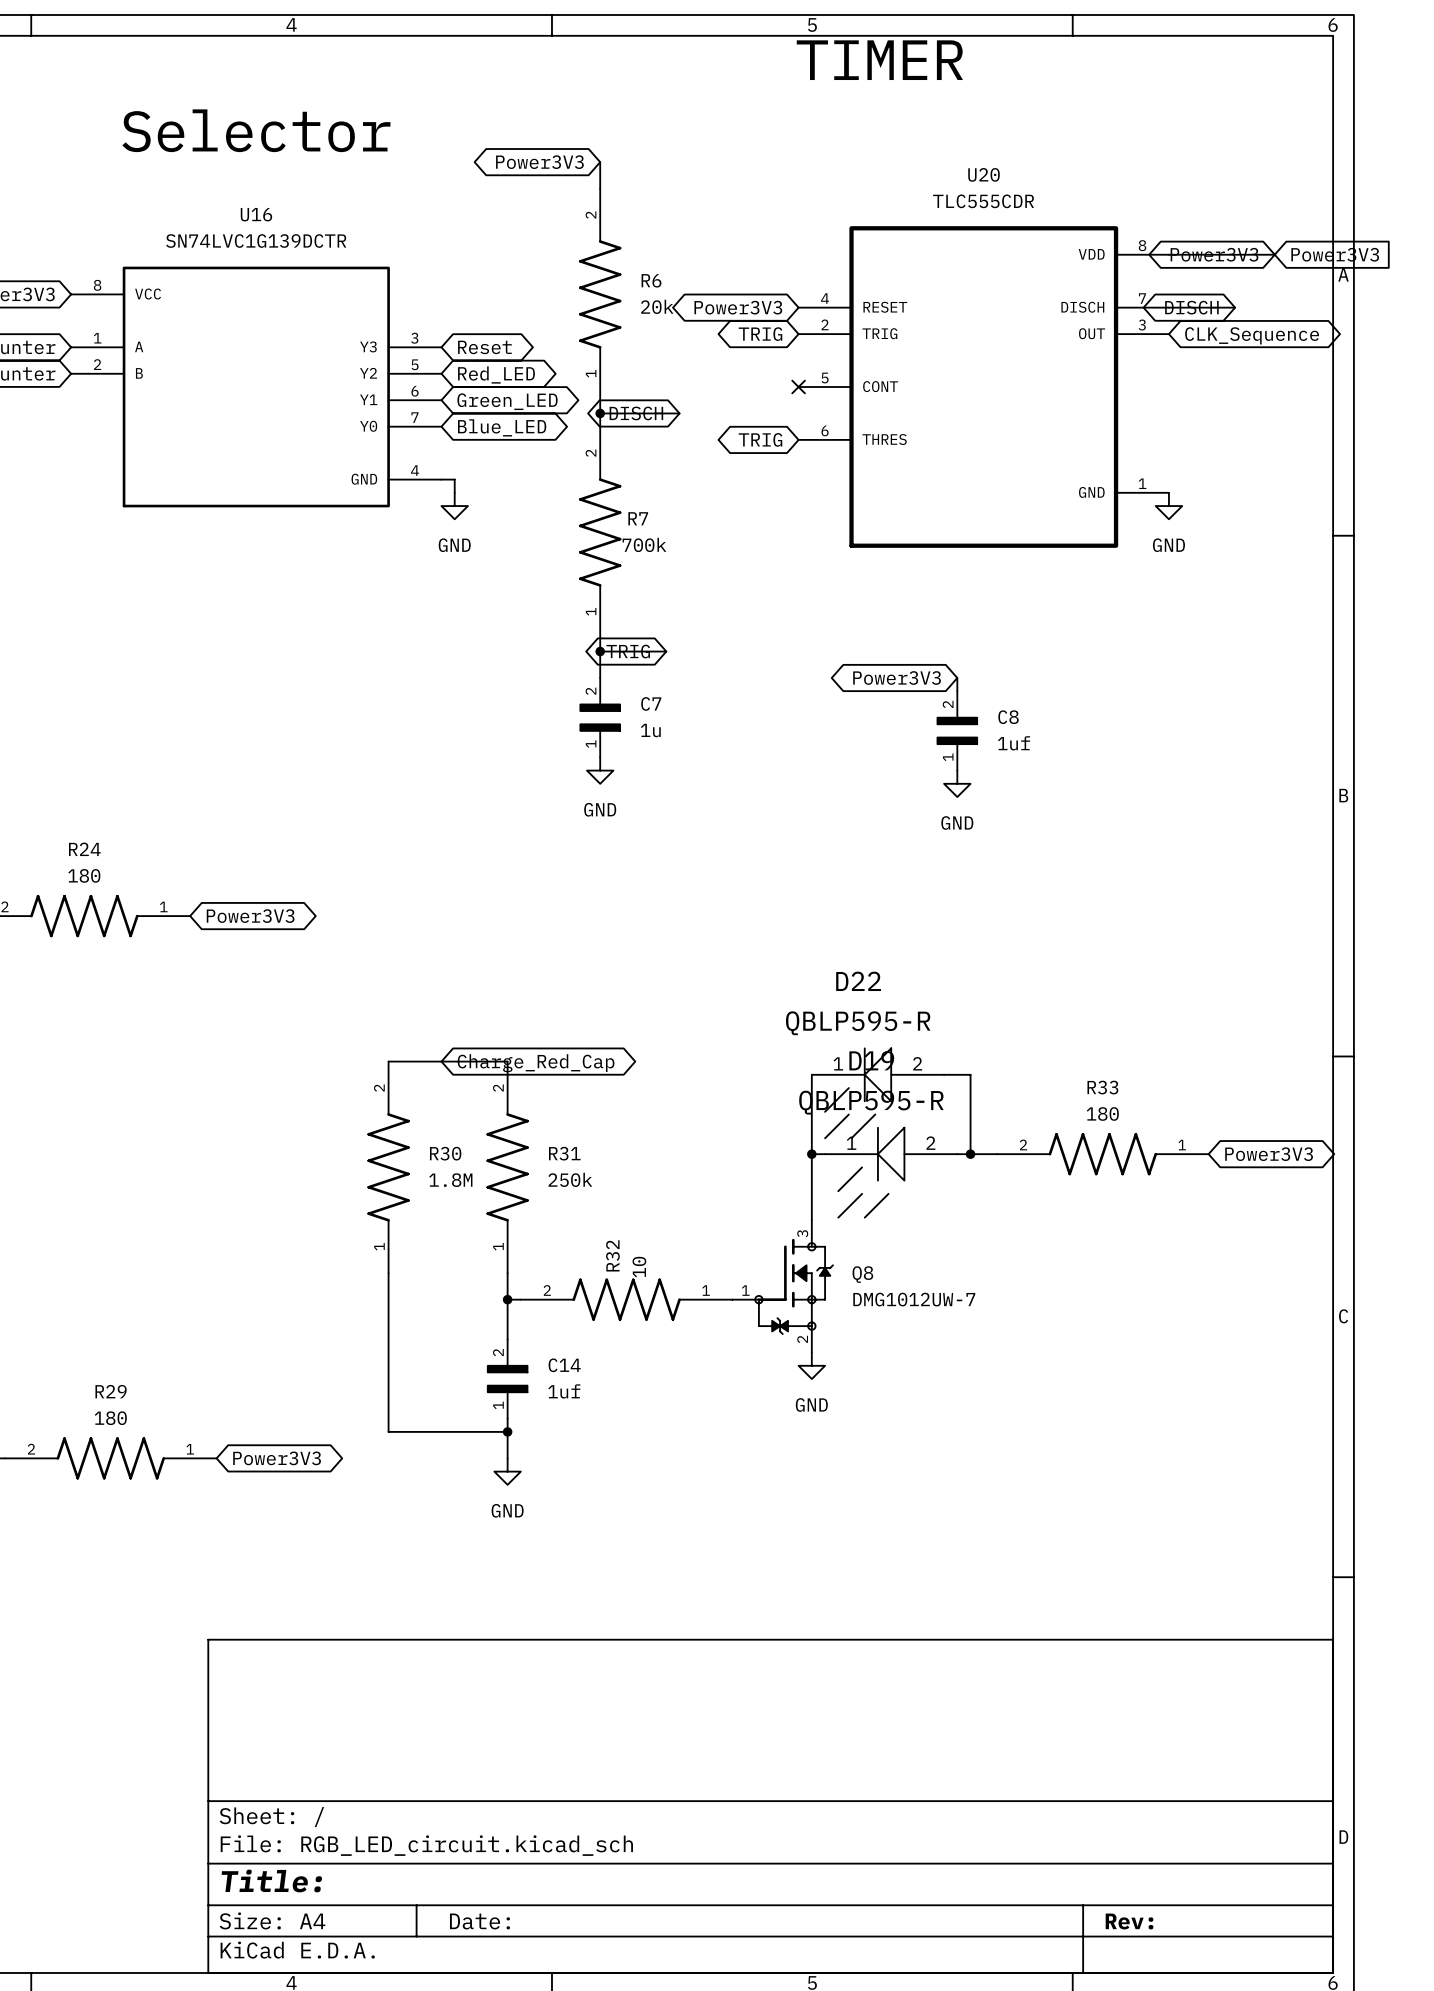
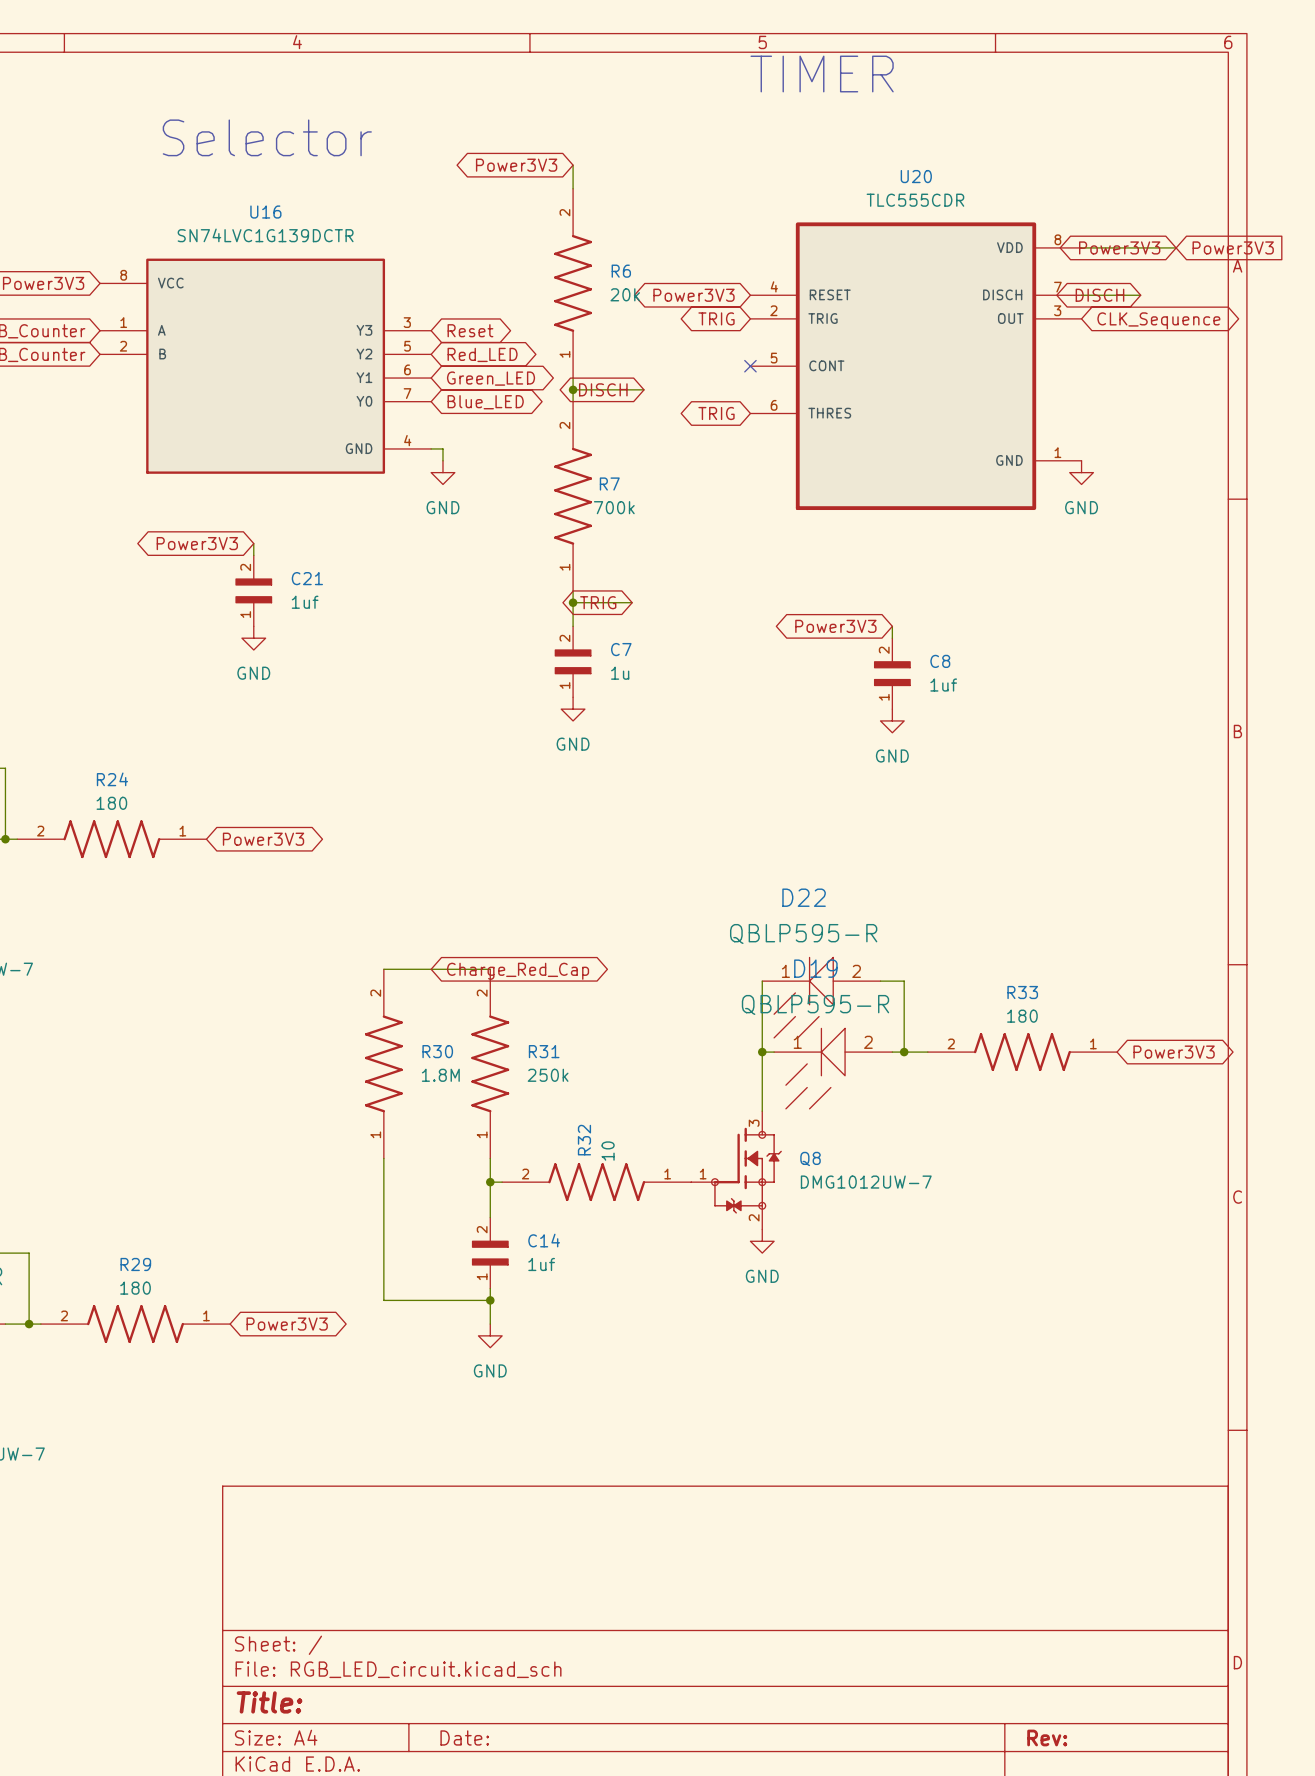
global label: none -> Power3V3 (197, 543)
wire: none -> (253, 543) (253, 555)
C21: none -> 1uf (253, 590)
power symbol: none -> GND (253, 638)

